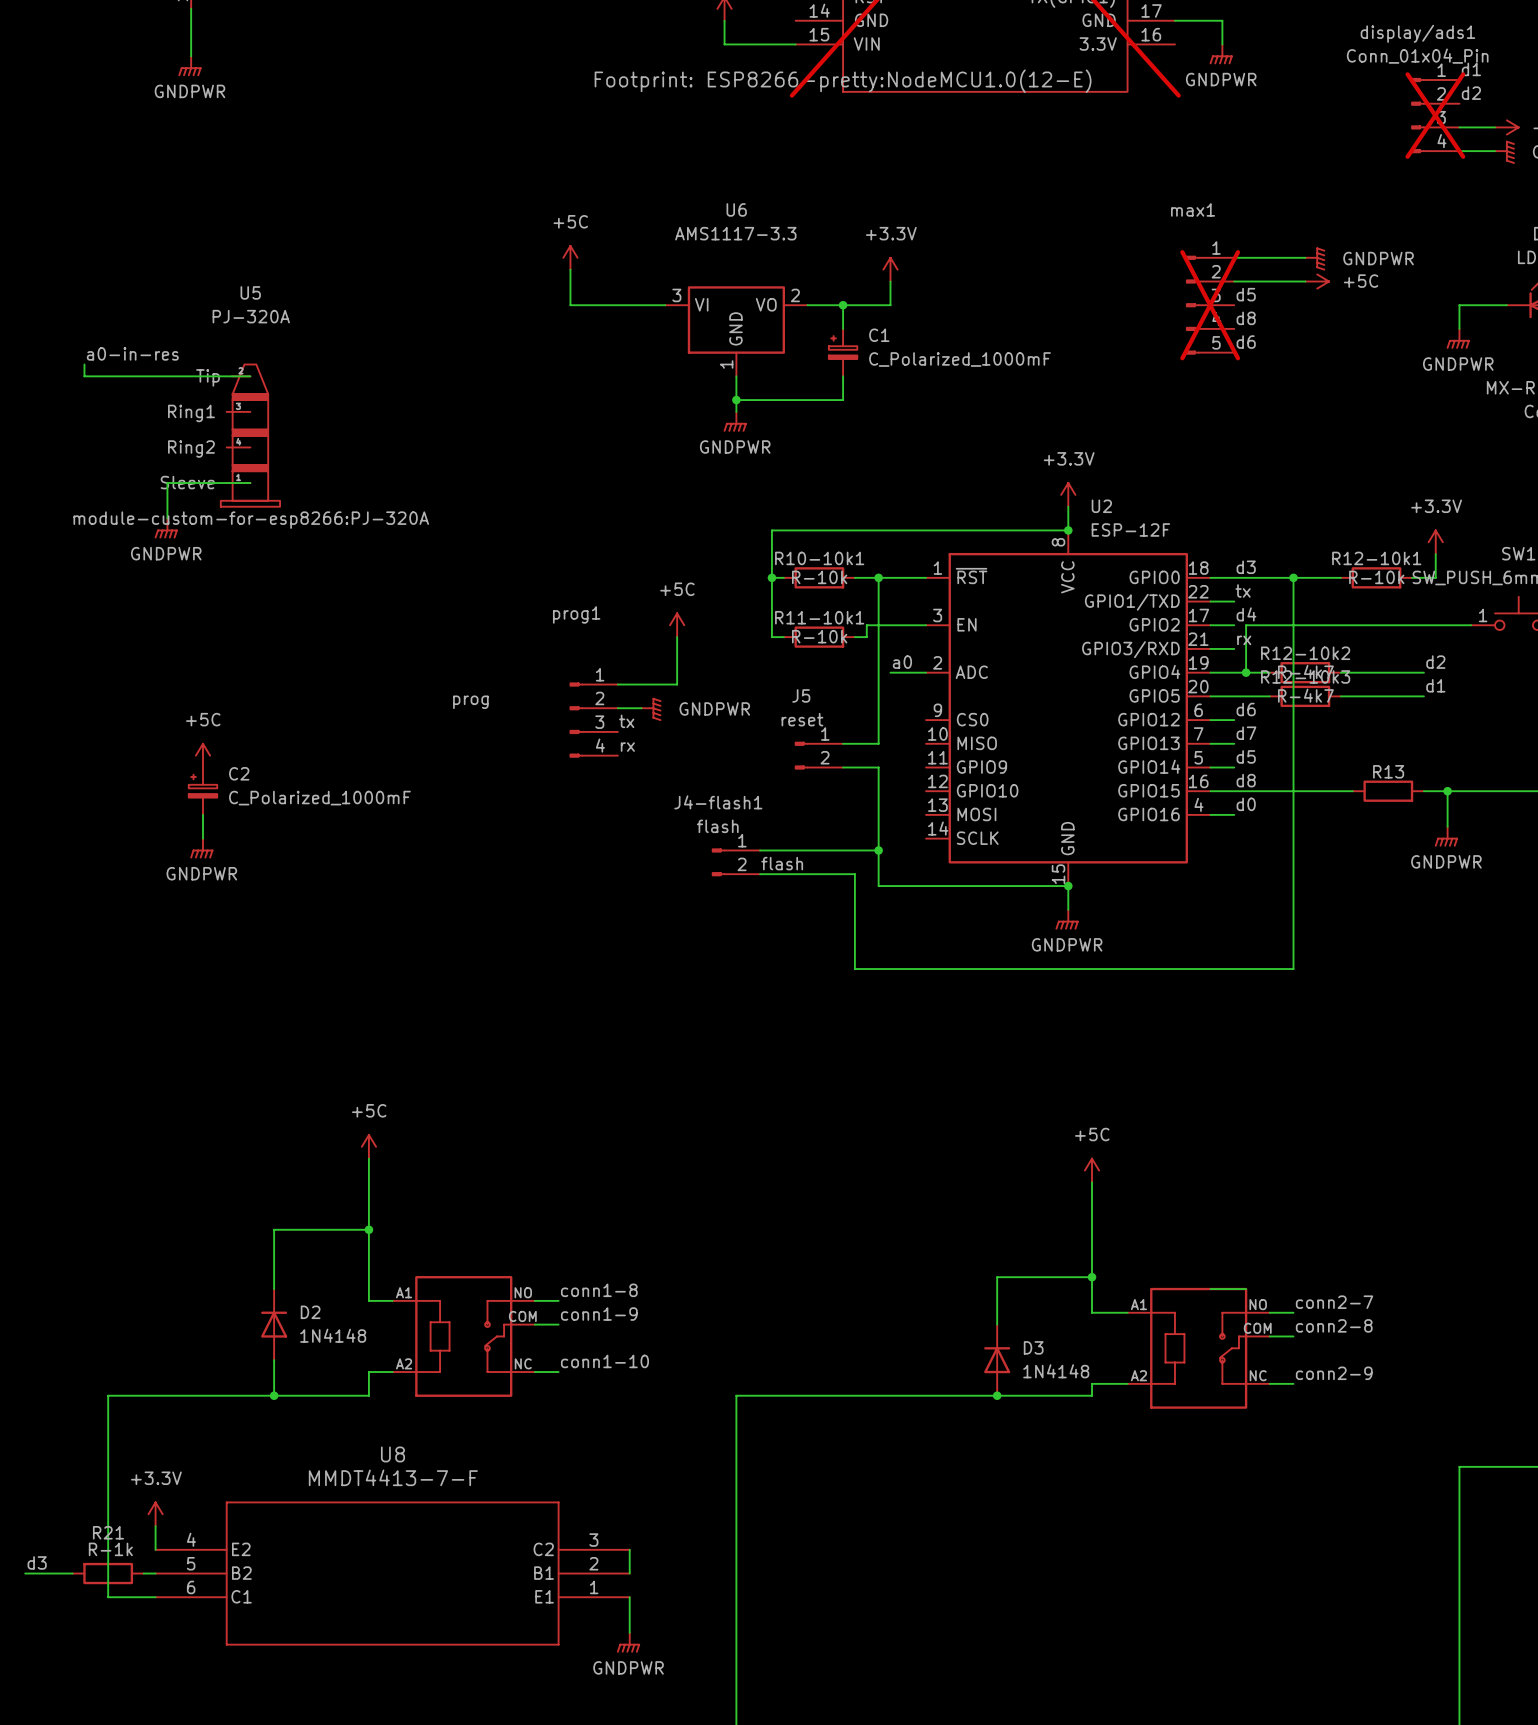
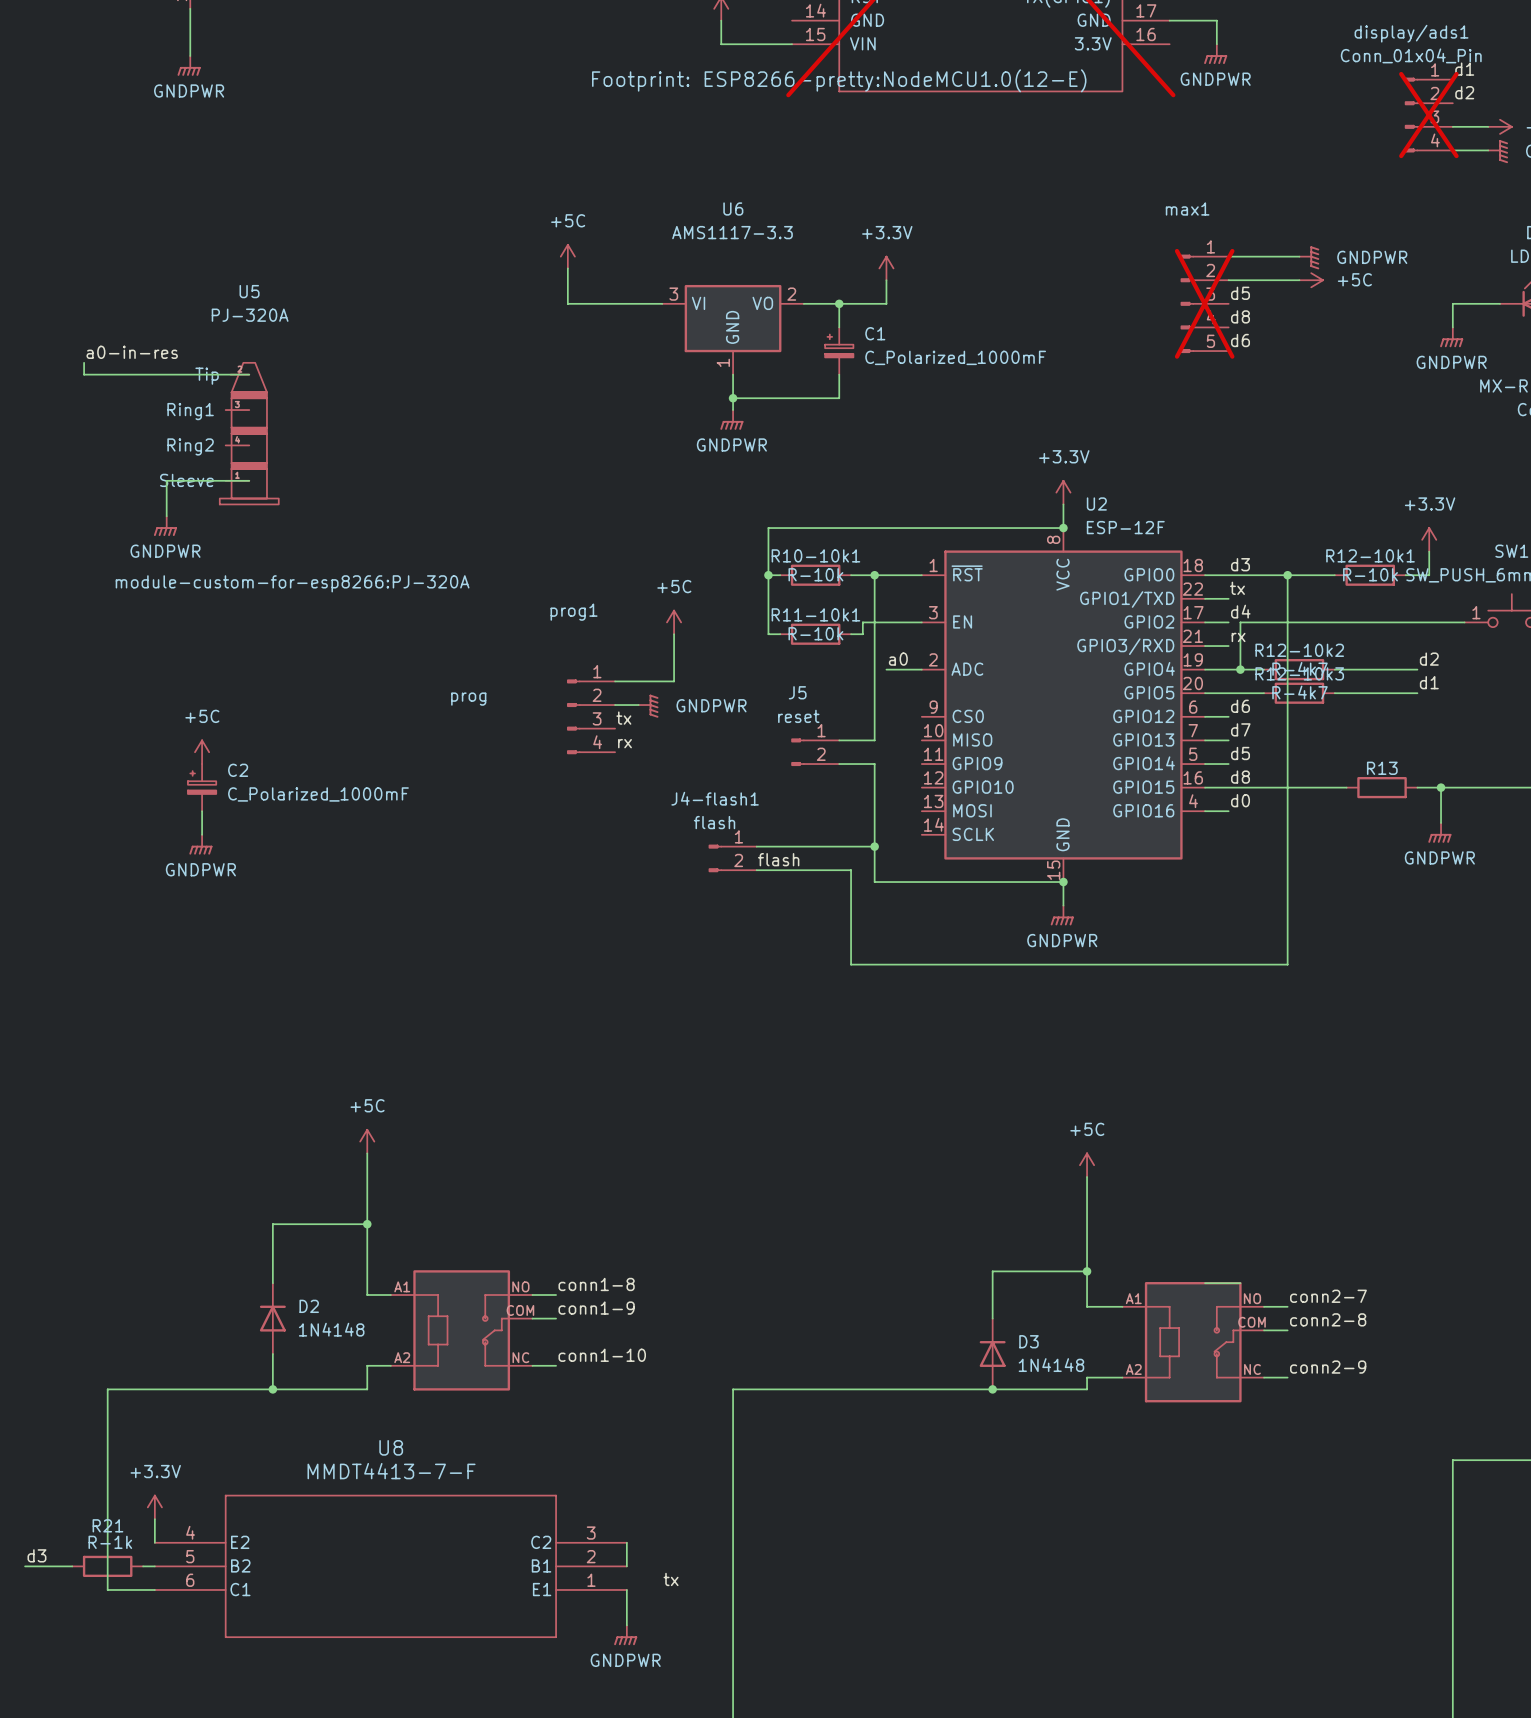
U5 text position: module-custom-for-esp8266:PJ-320A (251, 520) -> module-custom-for-esp8266:PJ-320A (292, 583)
label: none -> tx (671, 1579)

